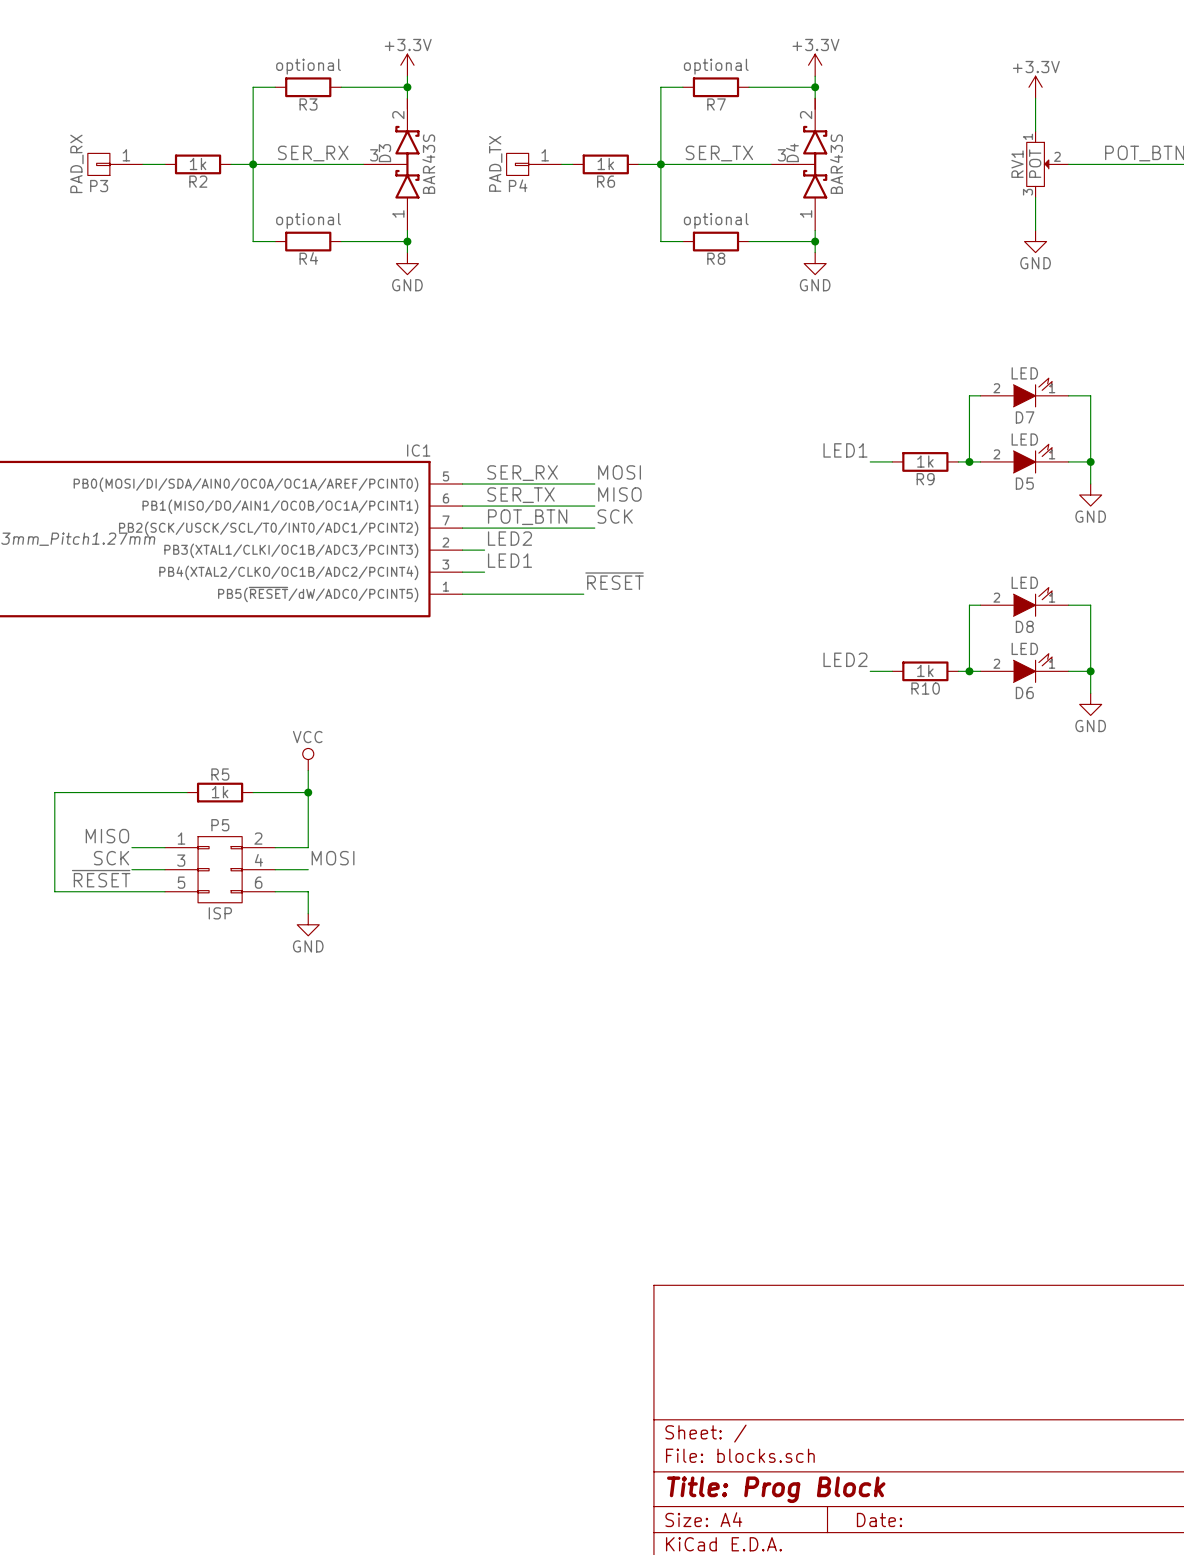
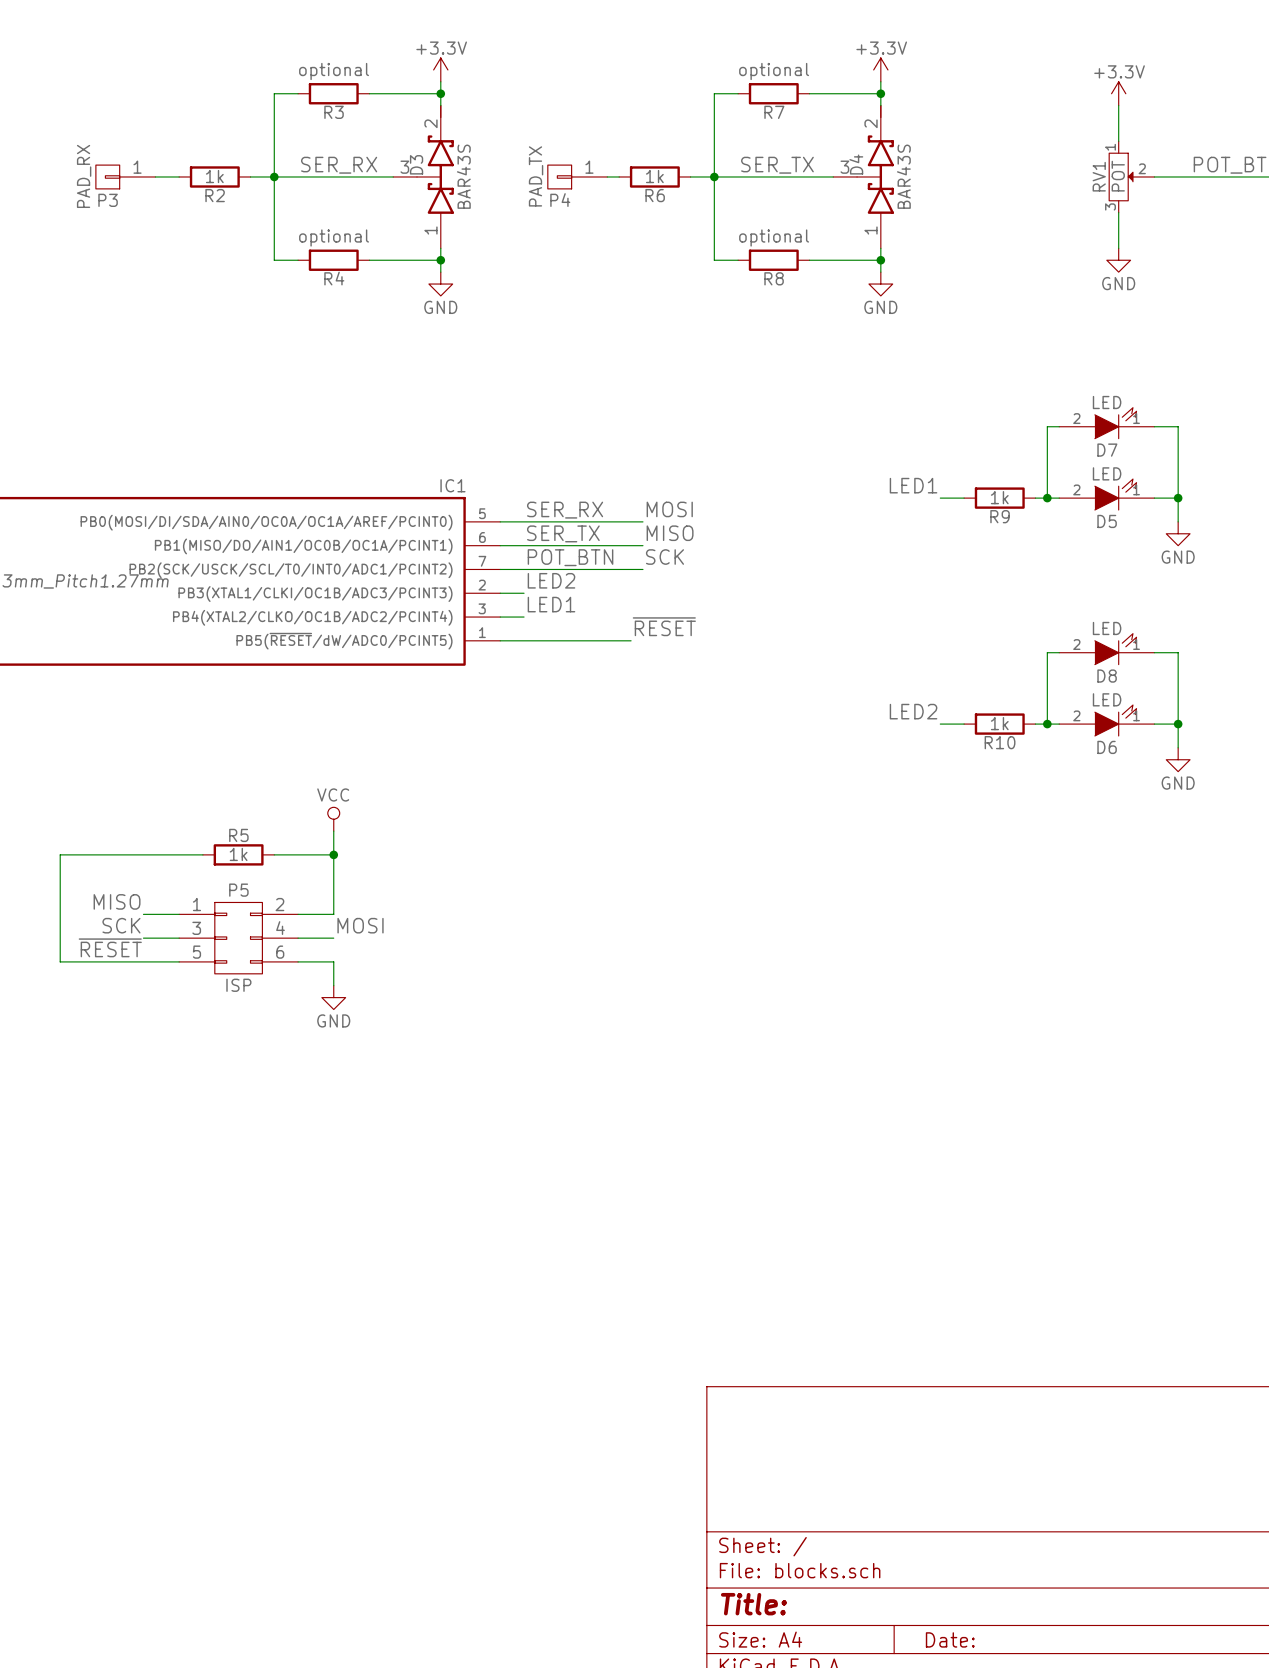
title block: Title: Prog Block (776, 1489) -> Title: (753, 1604)

